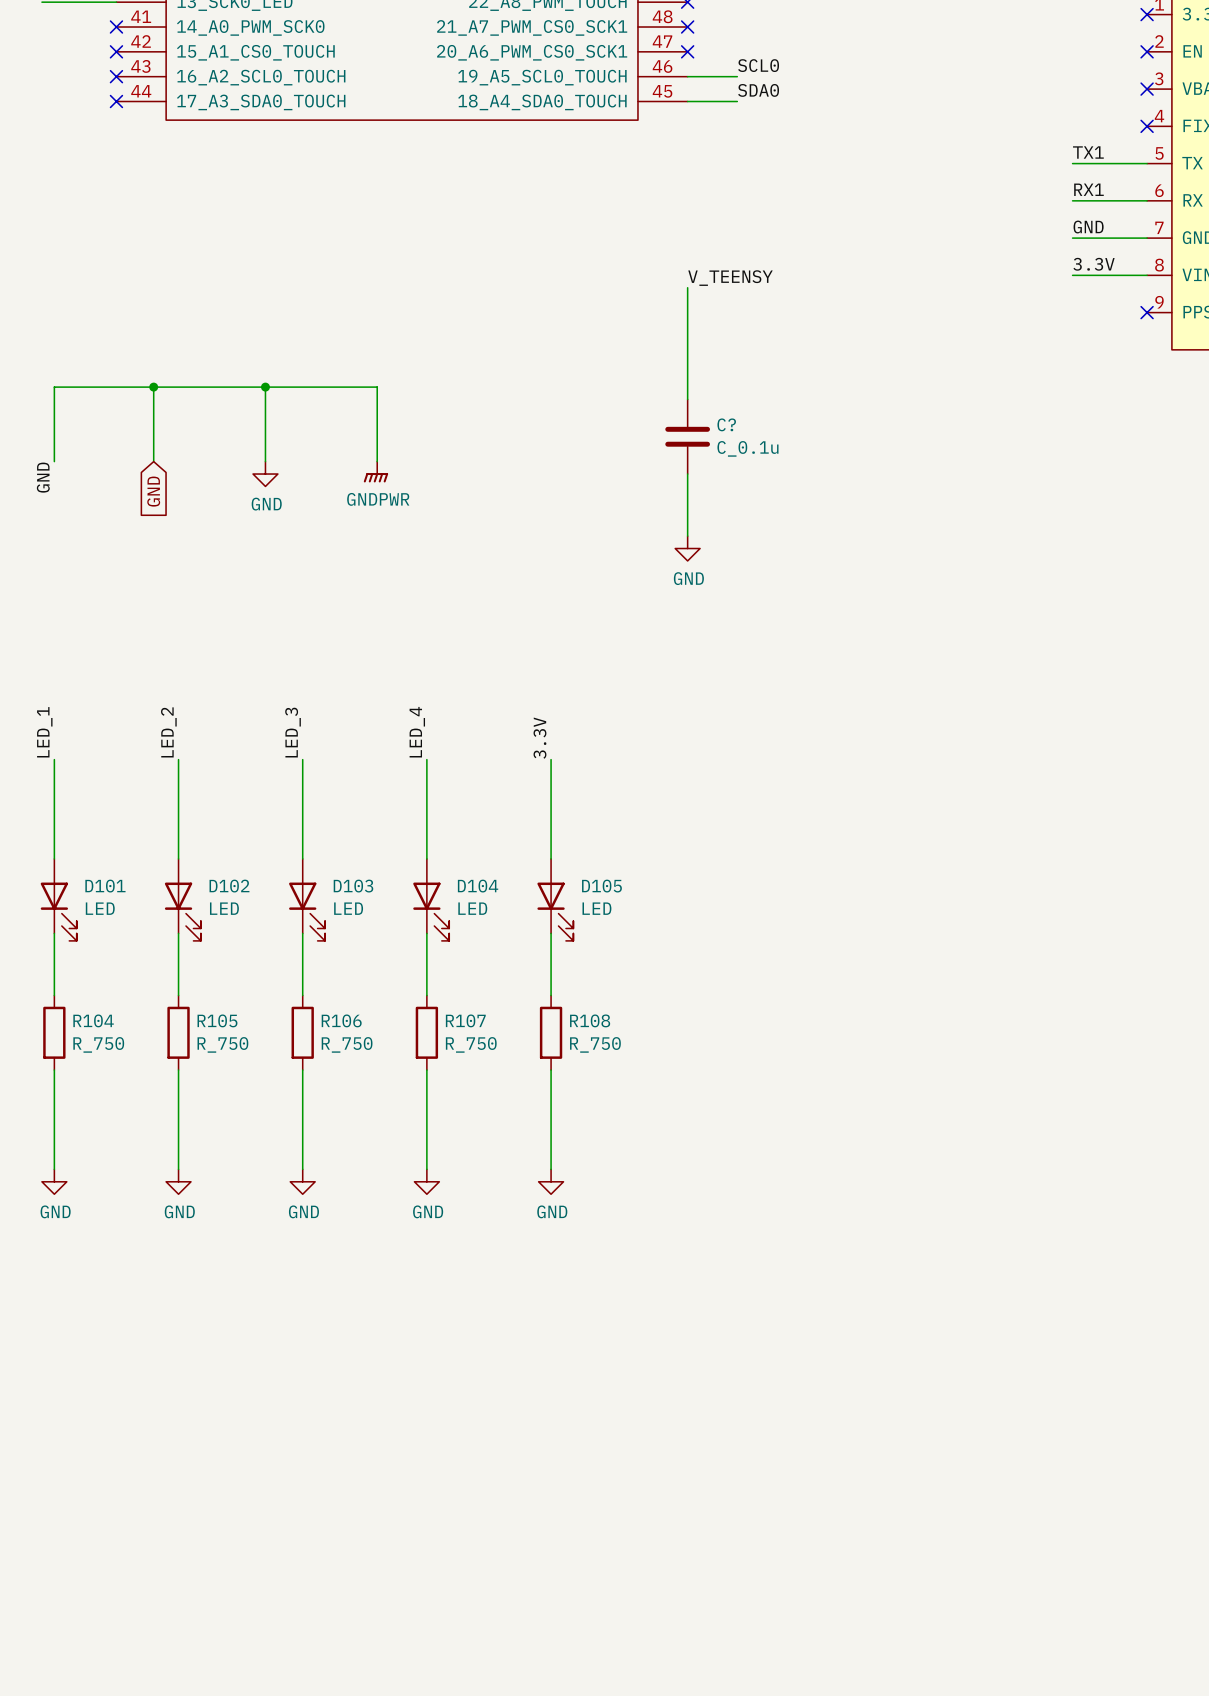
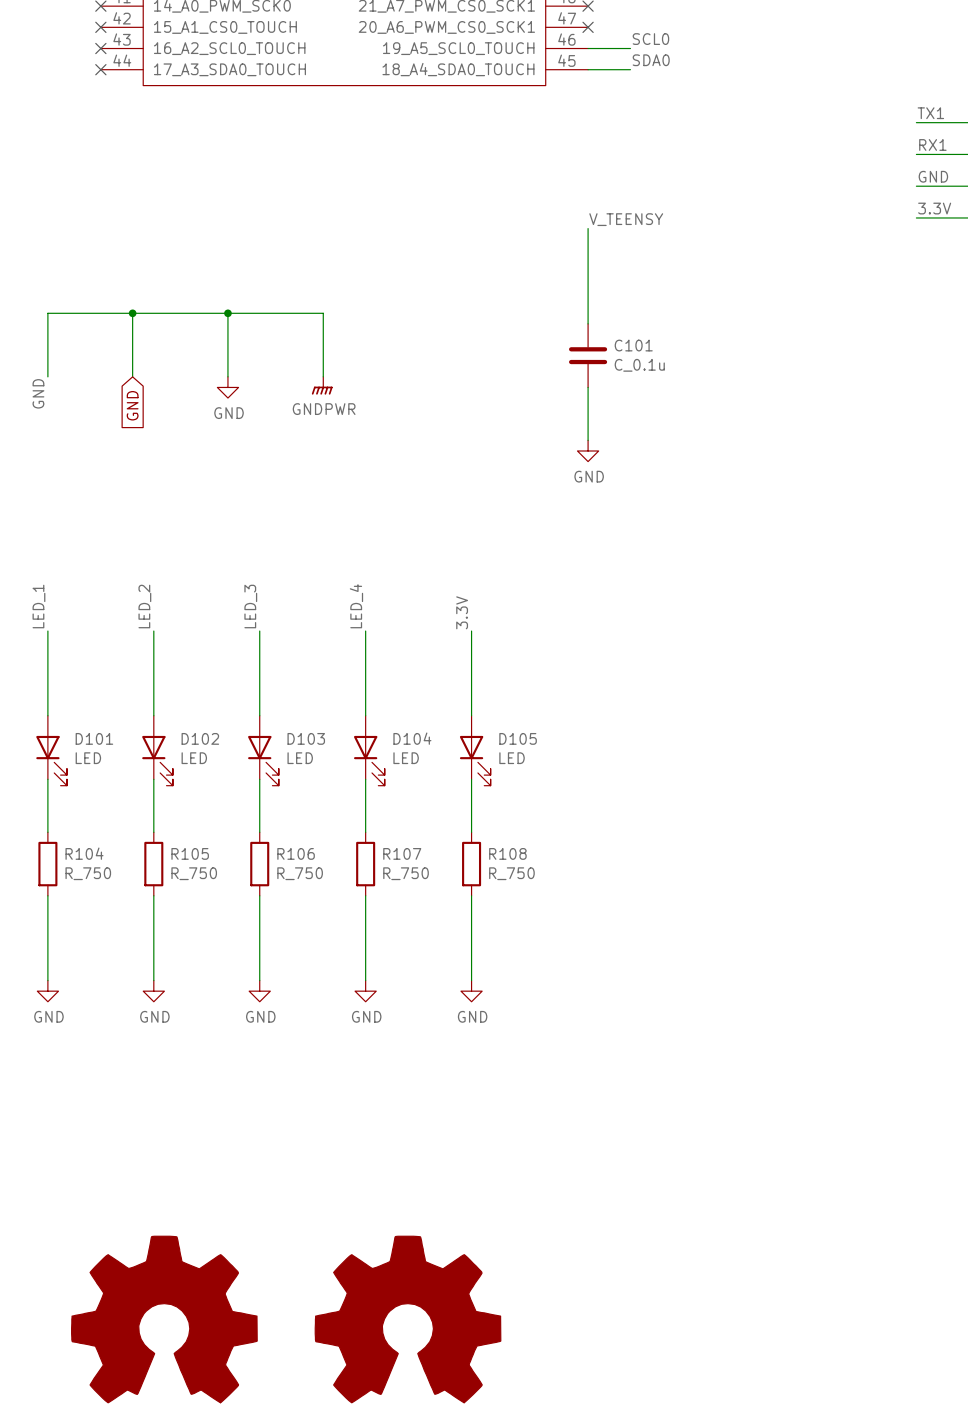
C? name: C? (726, 424) -> C101 (633, 345)
power symbol: none -> (164, 1319)
power symbol: none -> (408, 1319)

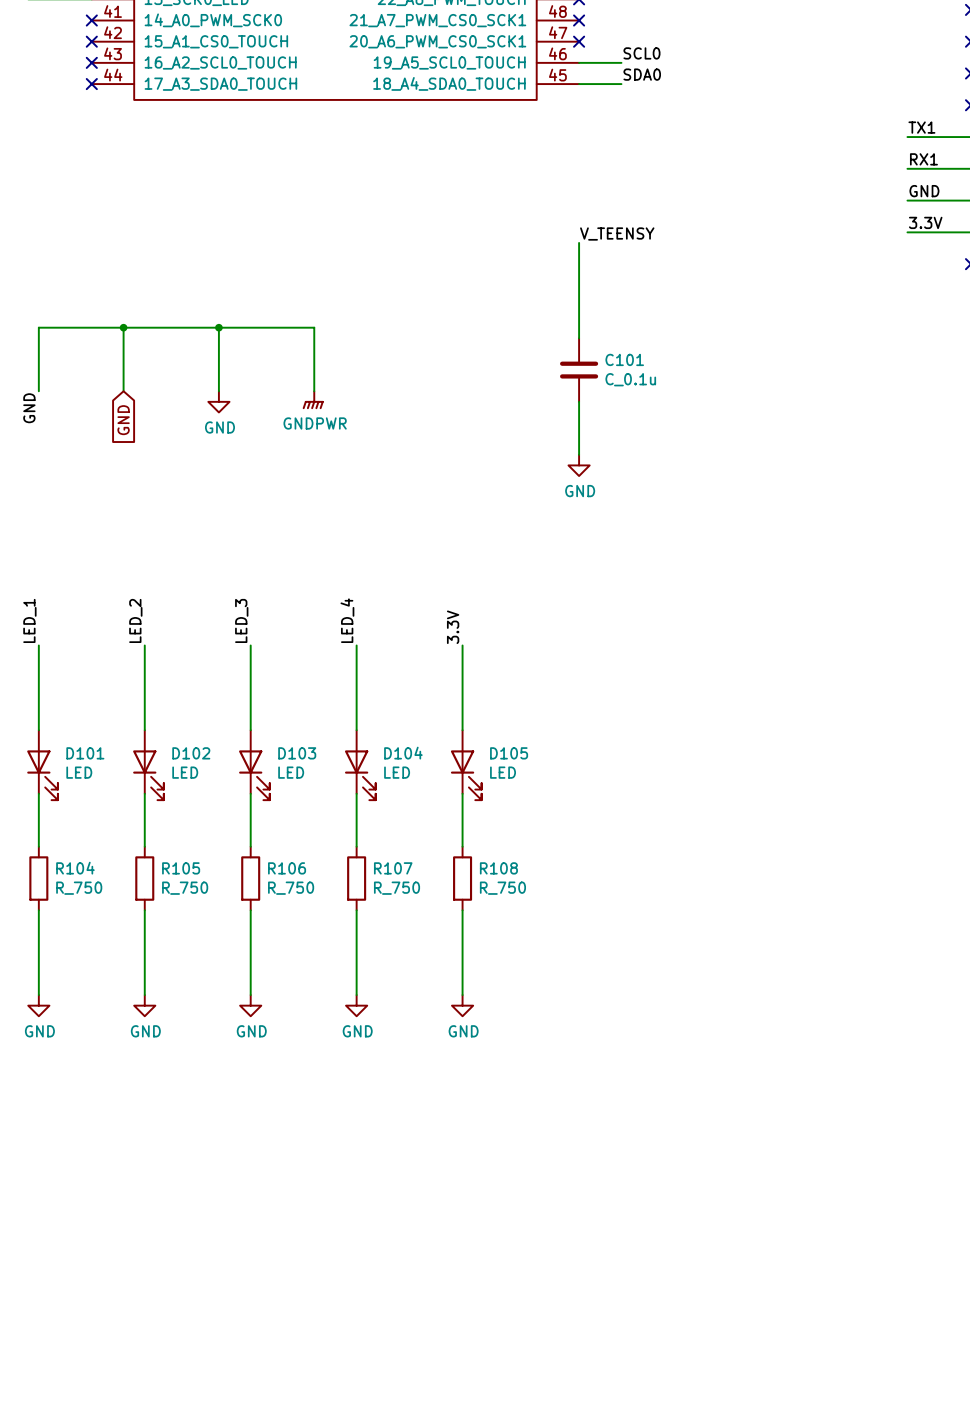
power symbol: (164, 1319) -> none
power symbol: (408, 1319) -> none

